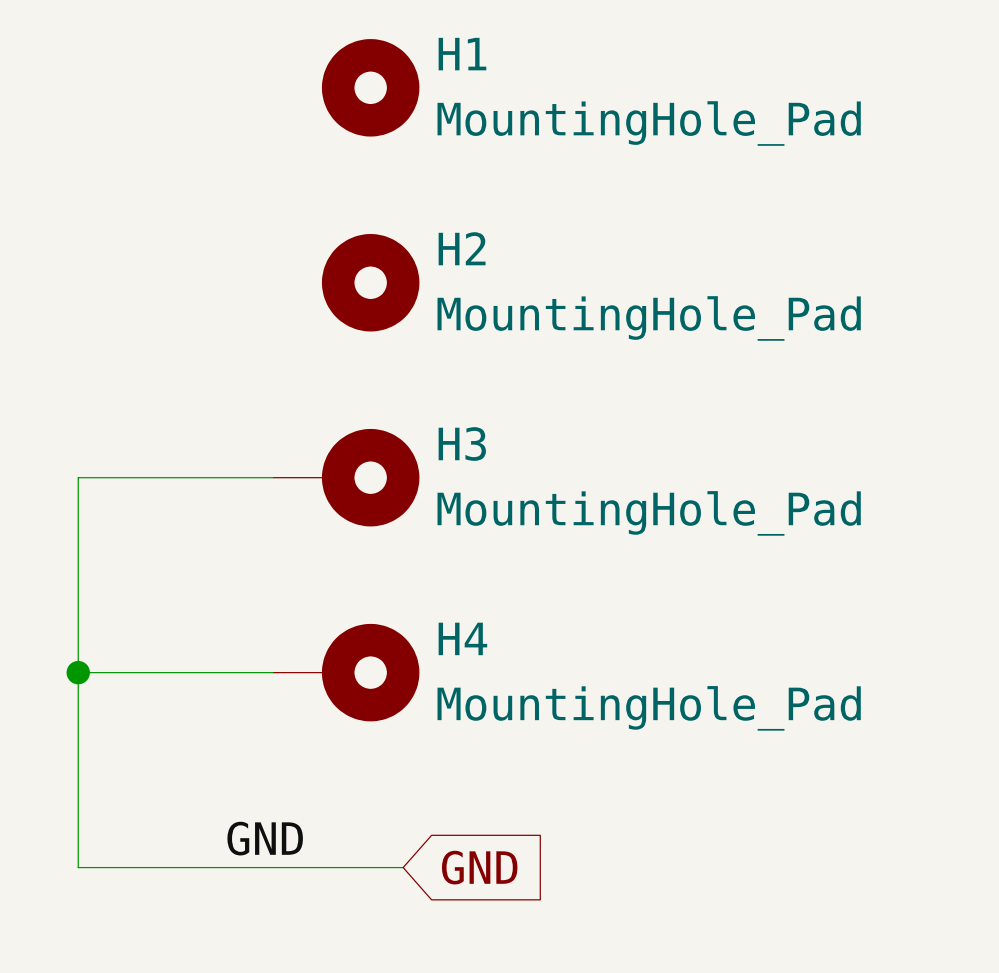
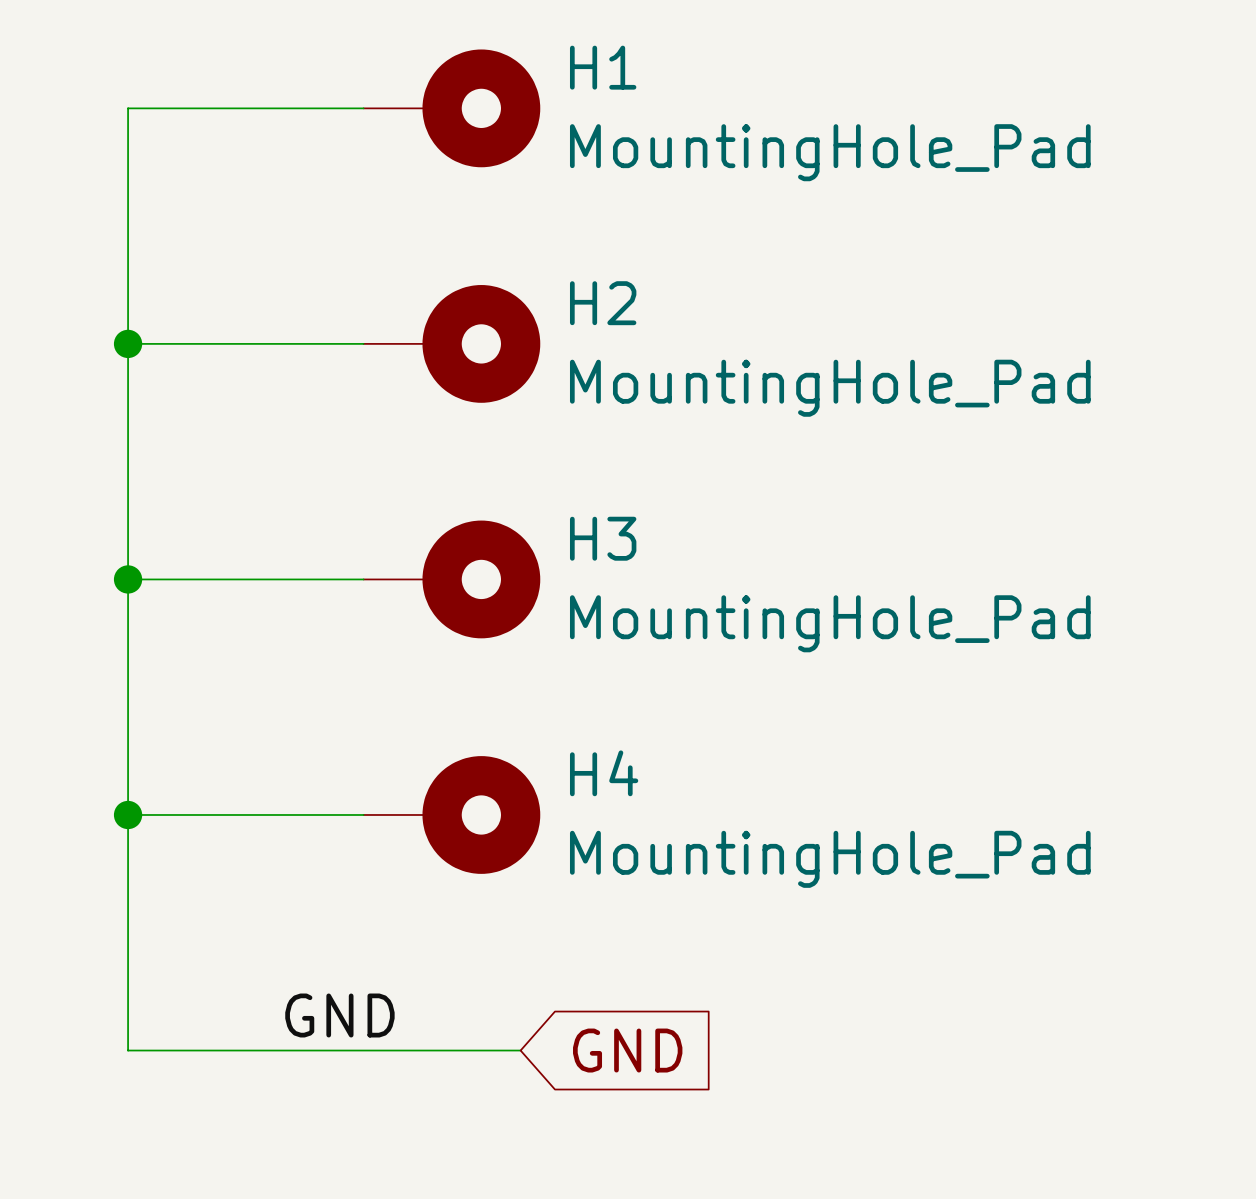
H1 symbol: [321, 39, 420, 137] -> [363, 49, 541, 168]
wire: none -> (363, 108) (128, 108) (128, 579)
H2 symbol: [321, 234, 420, 332] -> [363, 285, 541, 403]
wire: none -> (128, 343) (363, 343)
junction: none -> (128, 343)
junction: none -> (128, 579)

